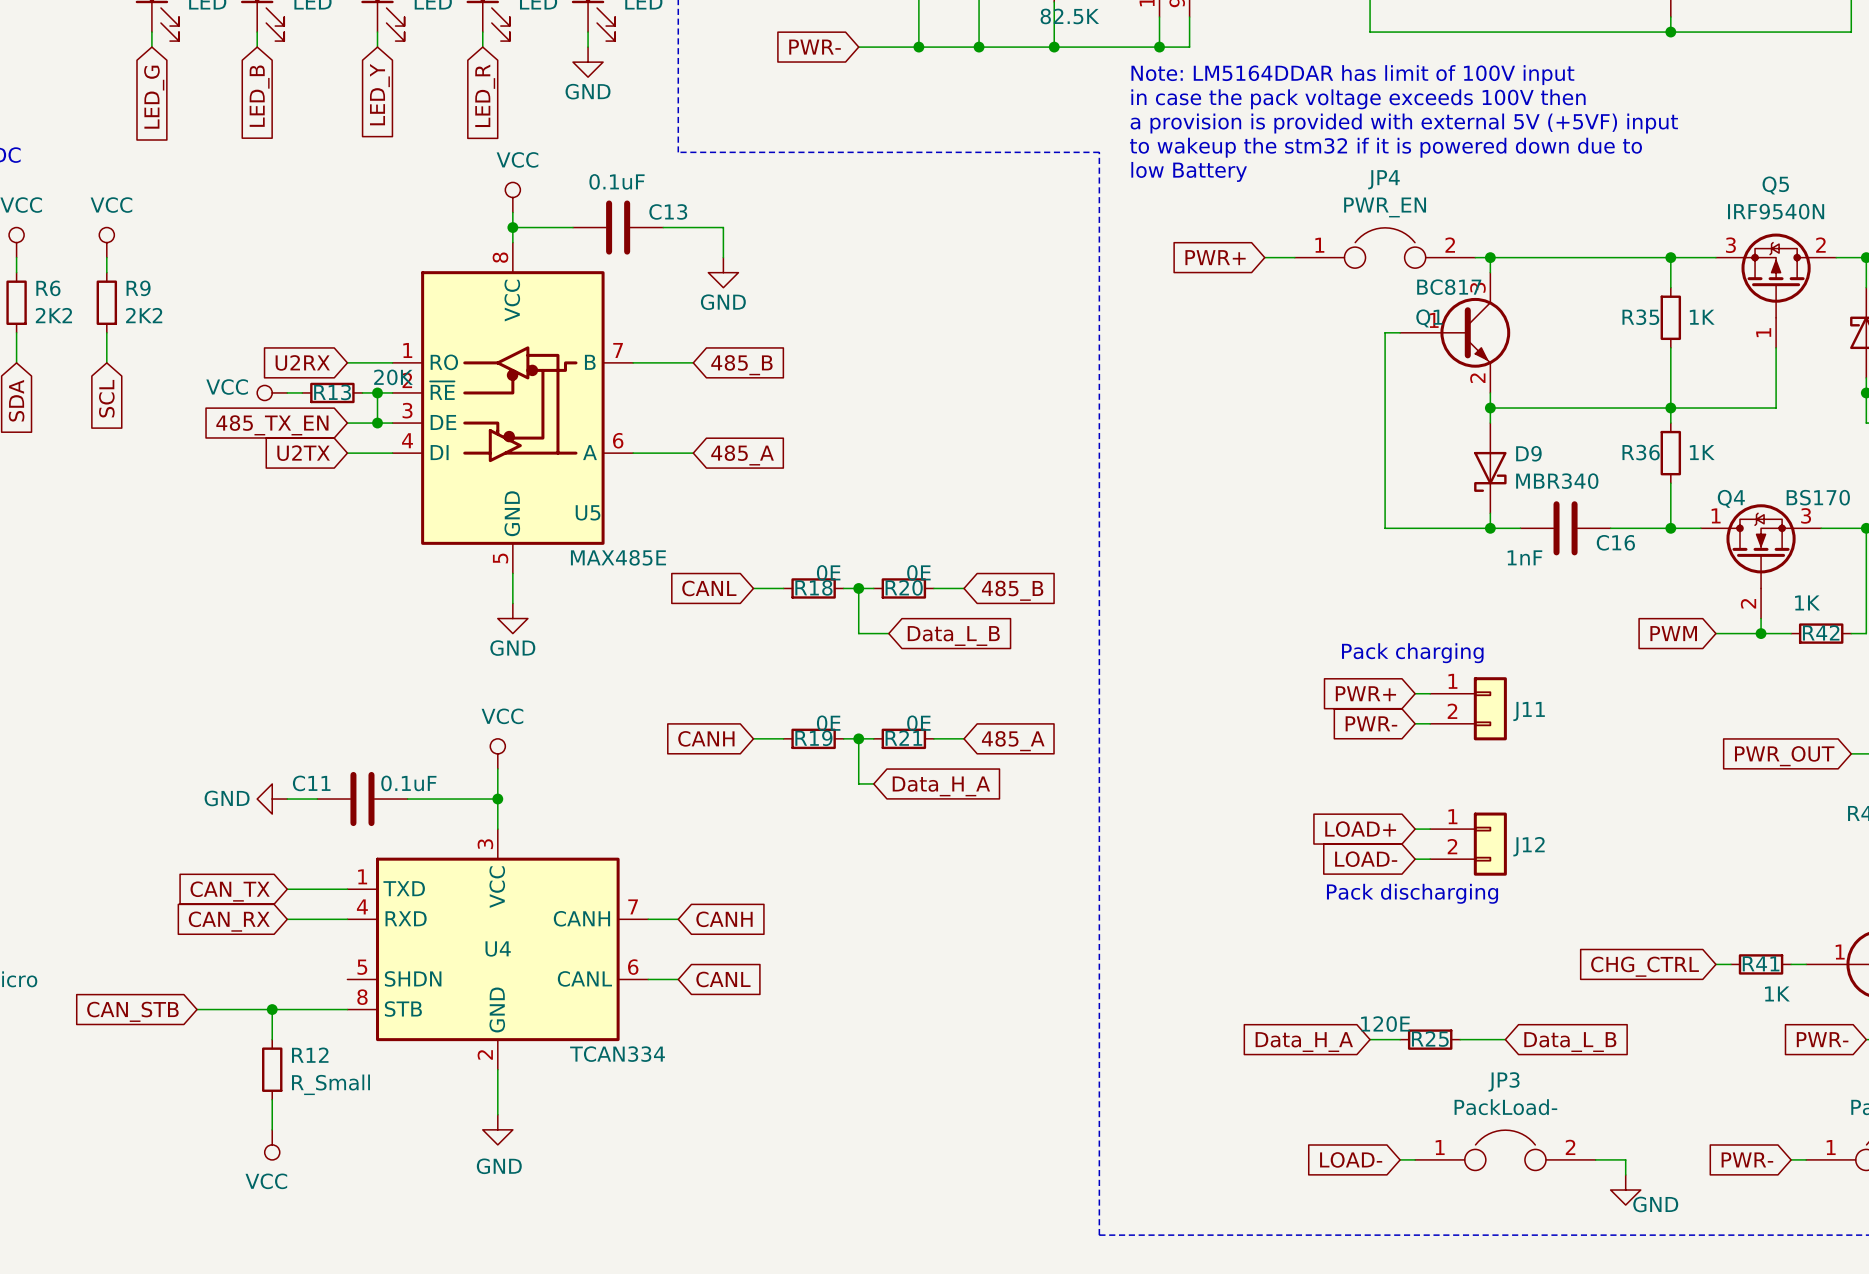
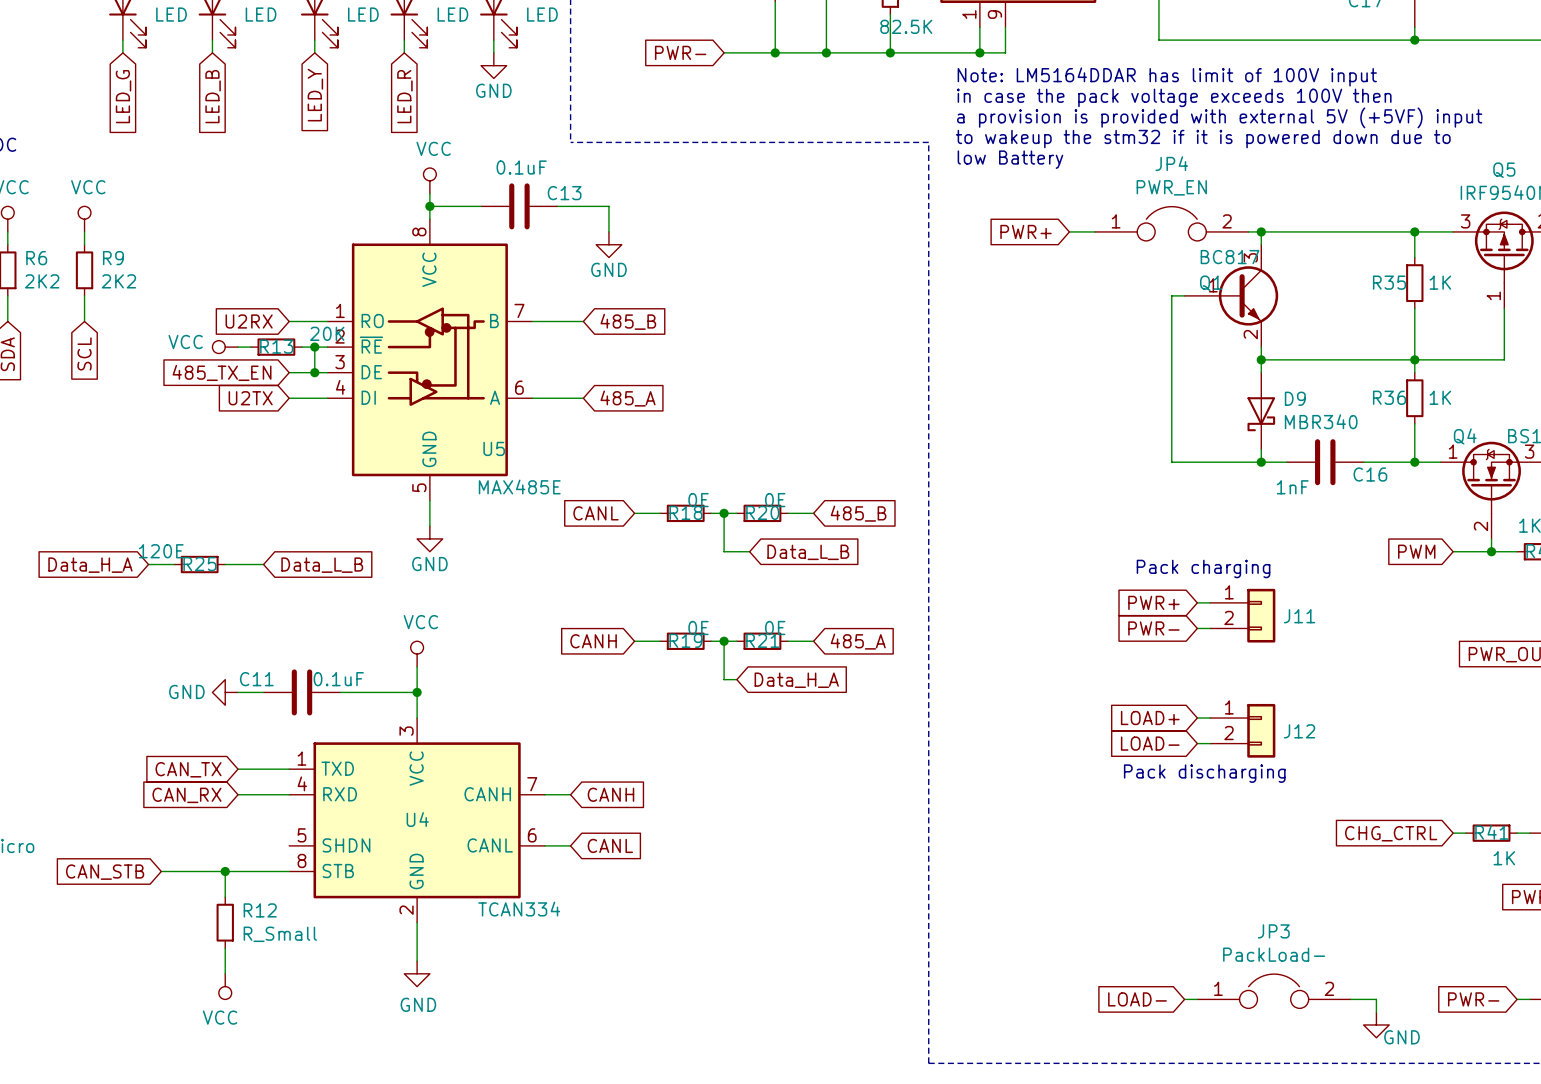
wire: none -> (148, 564) (174, 564)
wire: none -> (225, 564) (263, 564)
global label: none -> Data_H_A (90, 565)
global label: none -> Data_L_B (322, 565)
wire: (1370, 1039) (1400, 1039) -> none
R25 position: (1430, 1039) -> (199, 564)
wire: (1460, 1039) (1505, 1039) -> none
global label: Data_H_A (1304, 1042) -> none
global label: Data_L_B (1570, 1042) -> none

